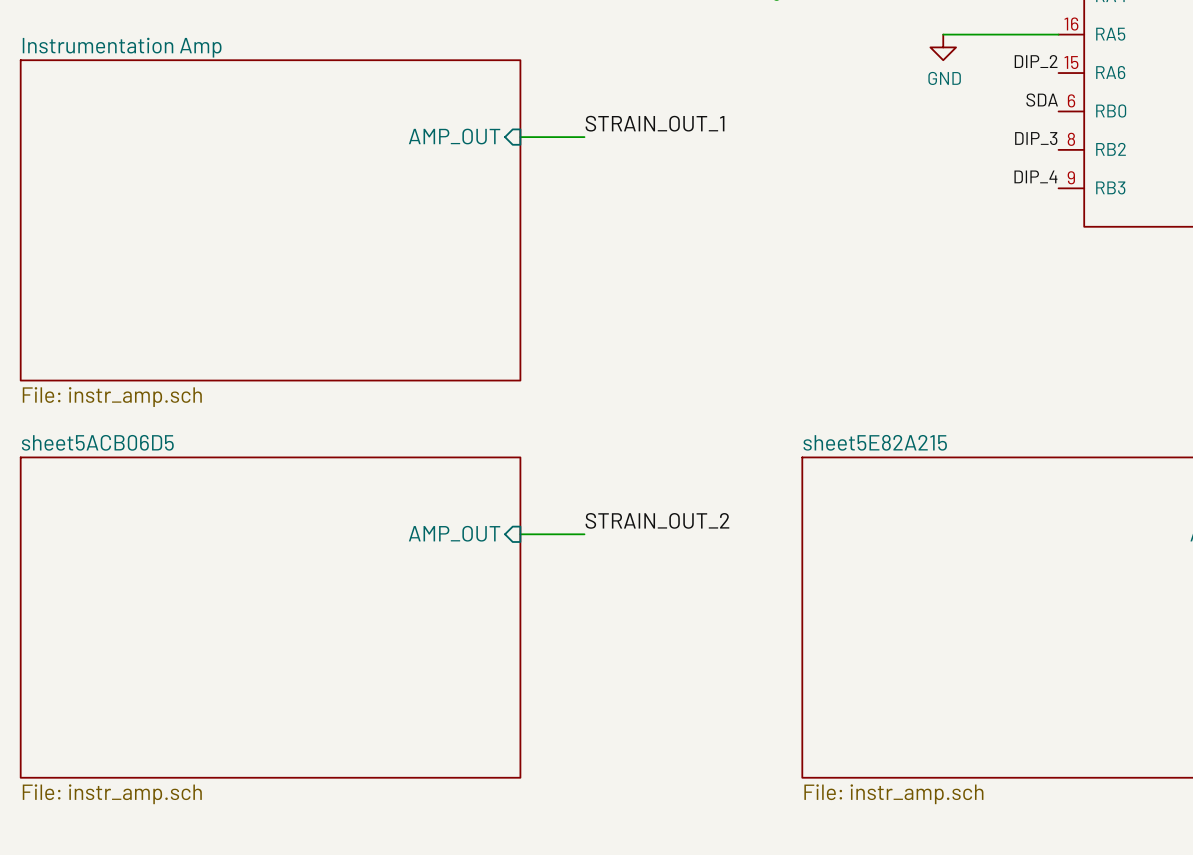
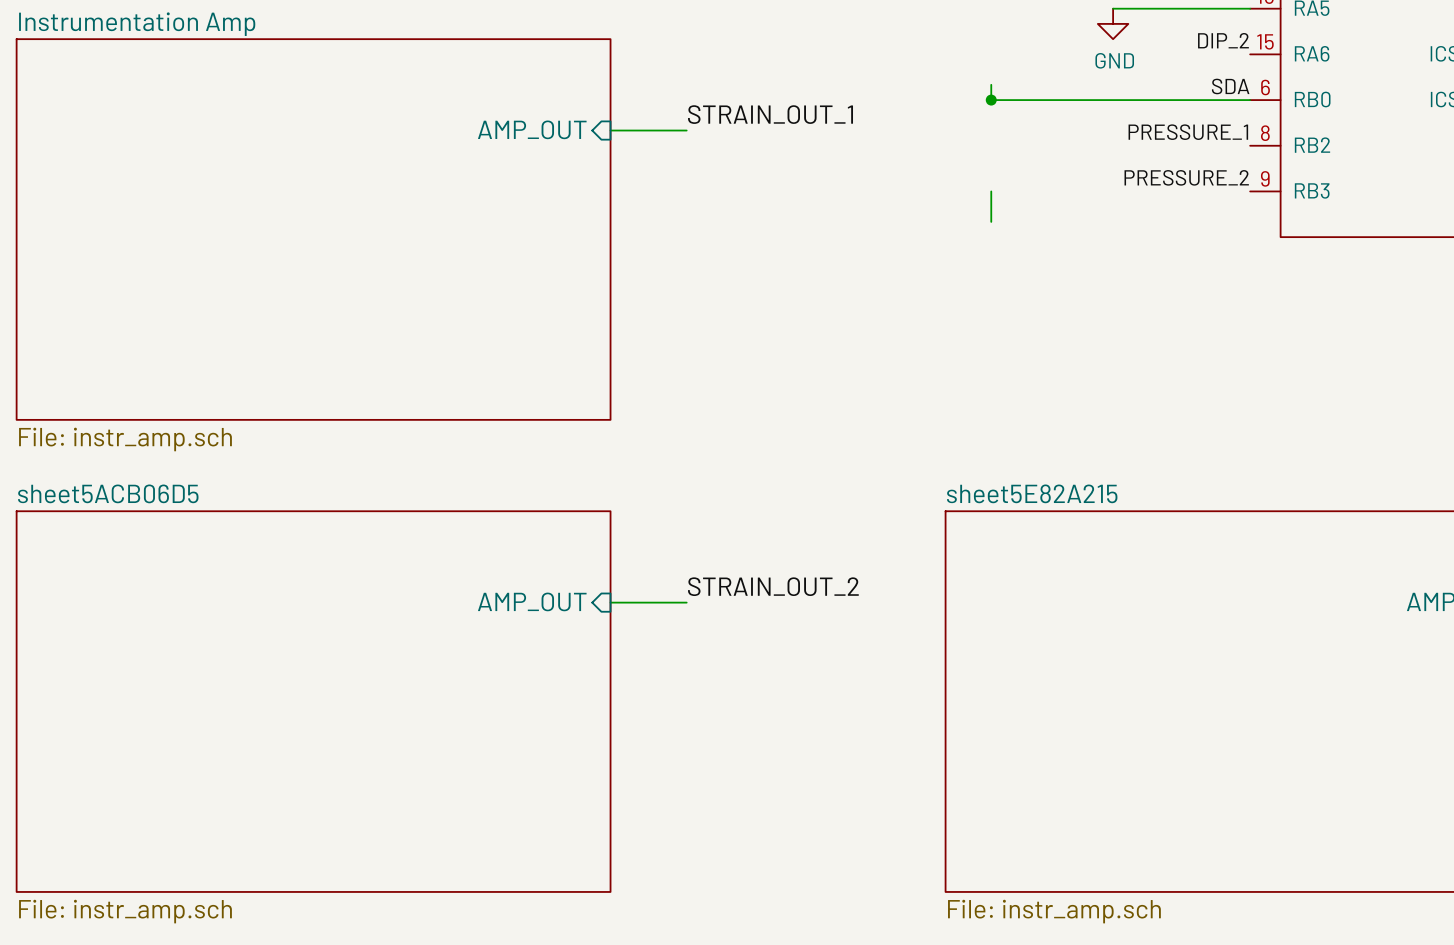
wire: none -> (991, 84) (991, 100) (1250, 100)
junction: none -> (991, 100)
label: DIP_3 (1036, 138) -> PRESSURE_1 (1188, 132)
label: DIP_4 (1035, 176) -> PRESSURE_2 (1186, 177)
wire: none -> (991, 191) (991, 221)

